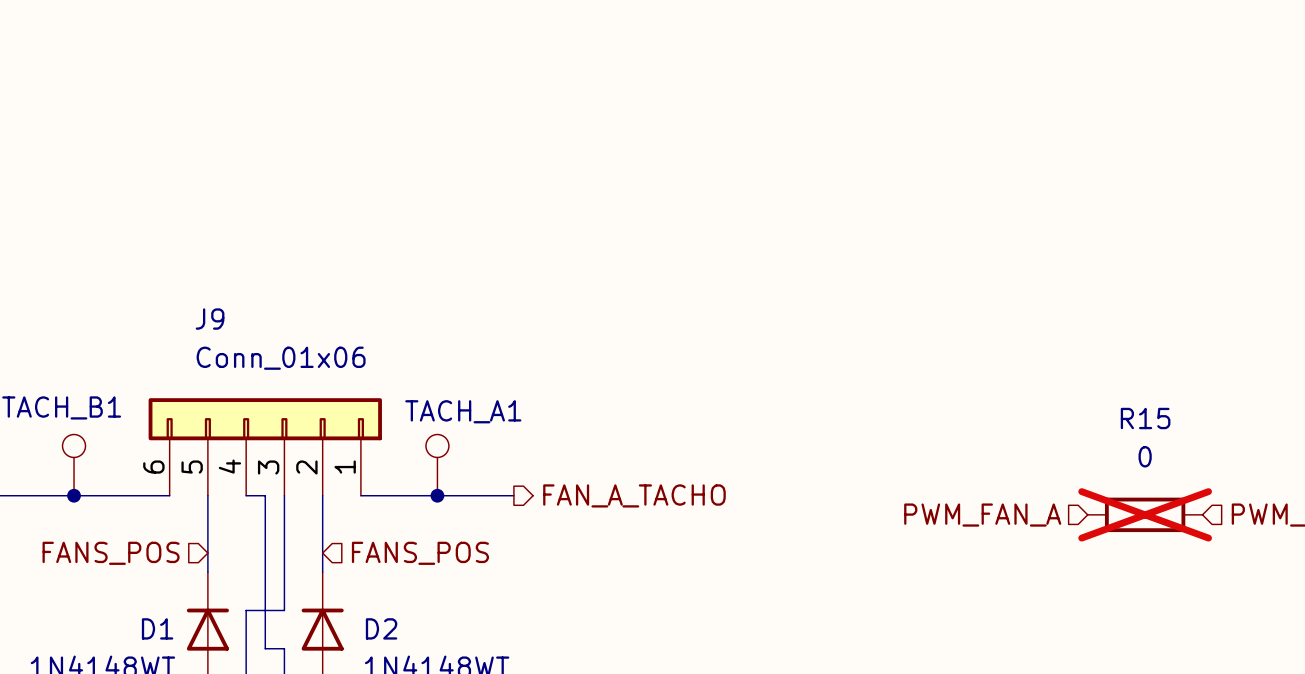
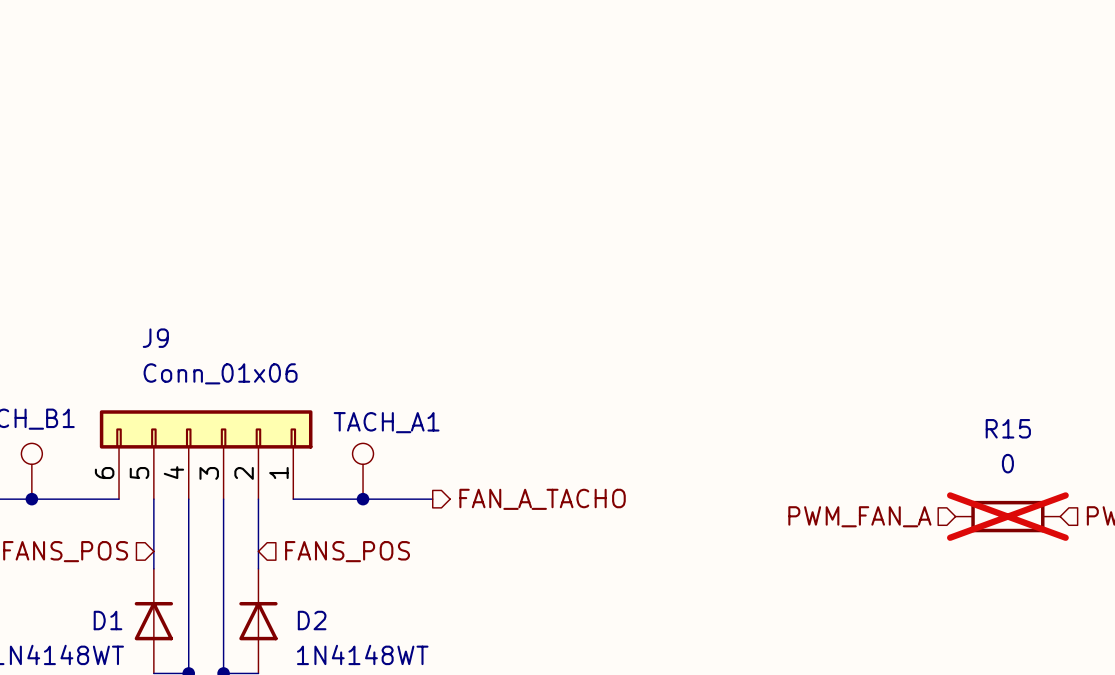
wire: (246, 495) (265, 495) (265, 648) (284, 648) -> (188, 499) (188, 603)
wire: (246, 610) (284, 610) -> (223, 638) (223, 603)

